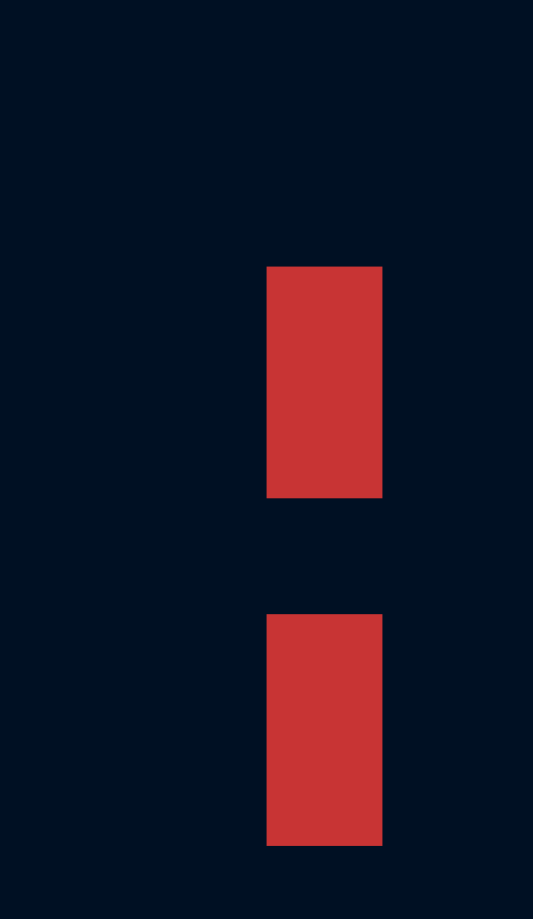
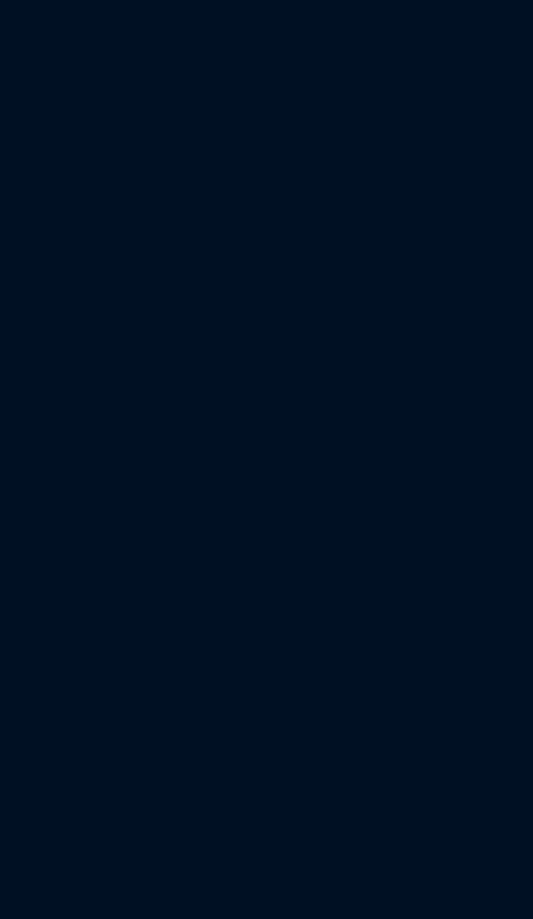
part: (324, 382) -> none
part: (324, 730) -> none

